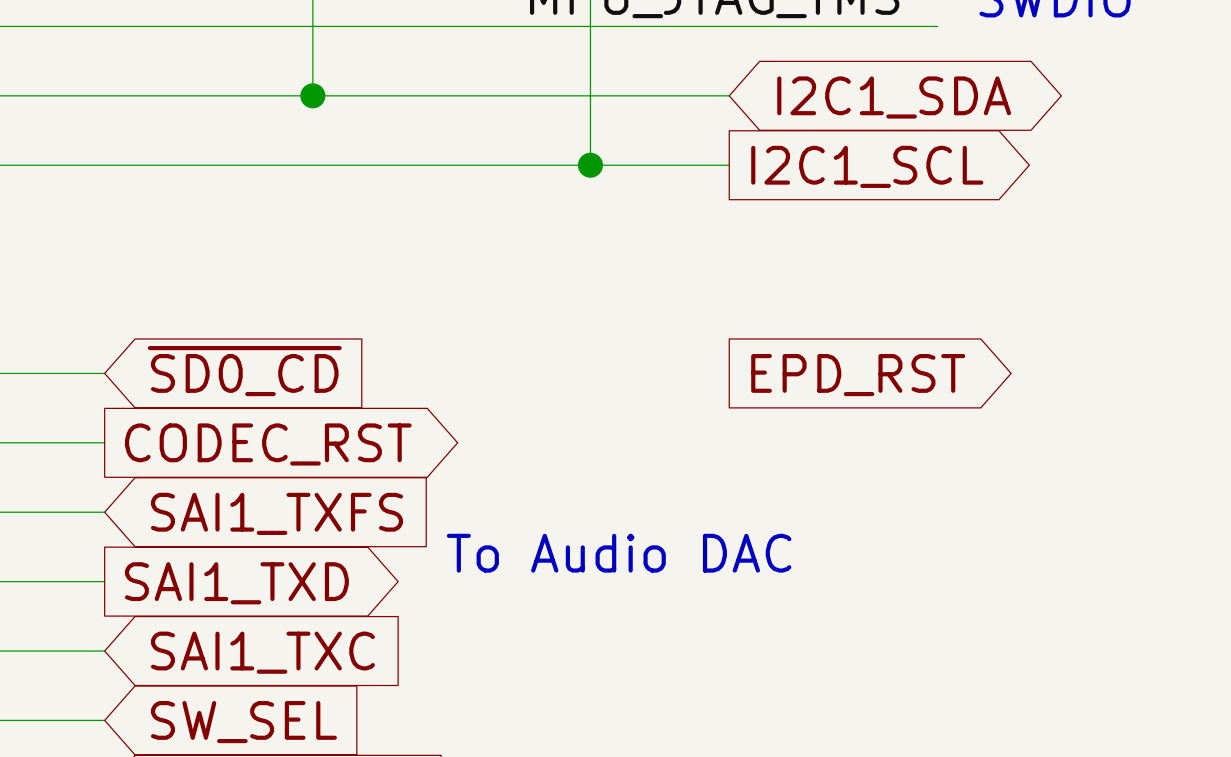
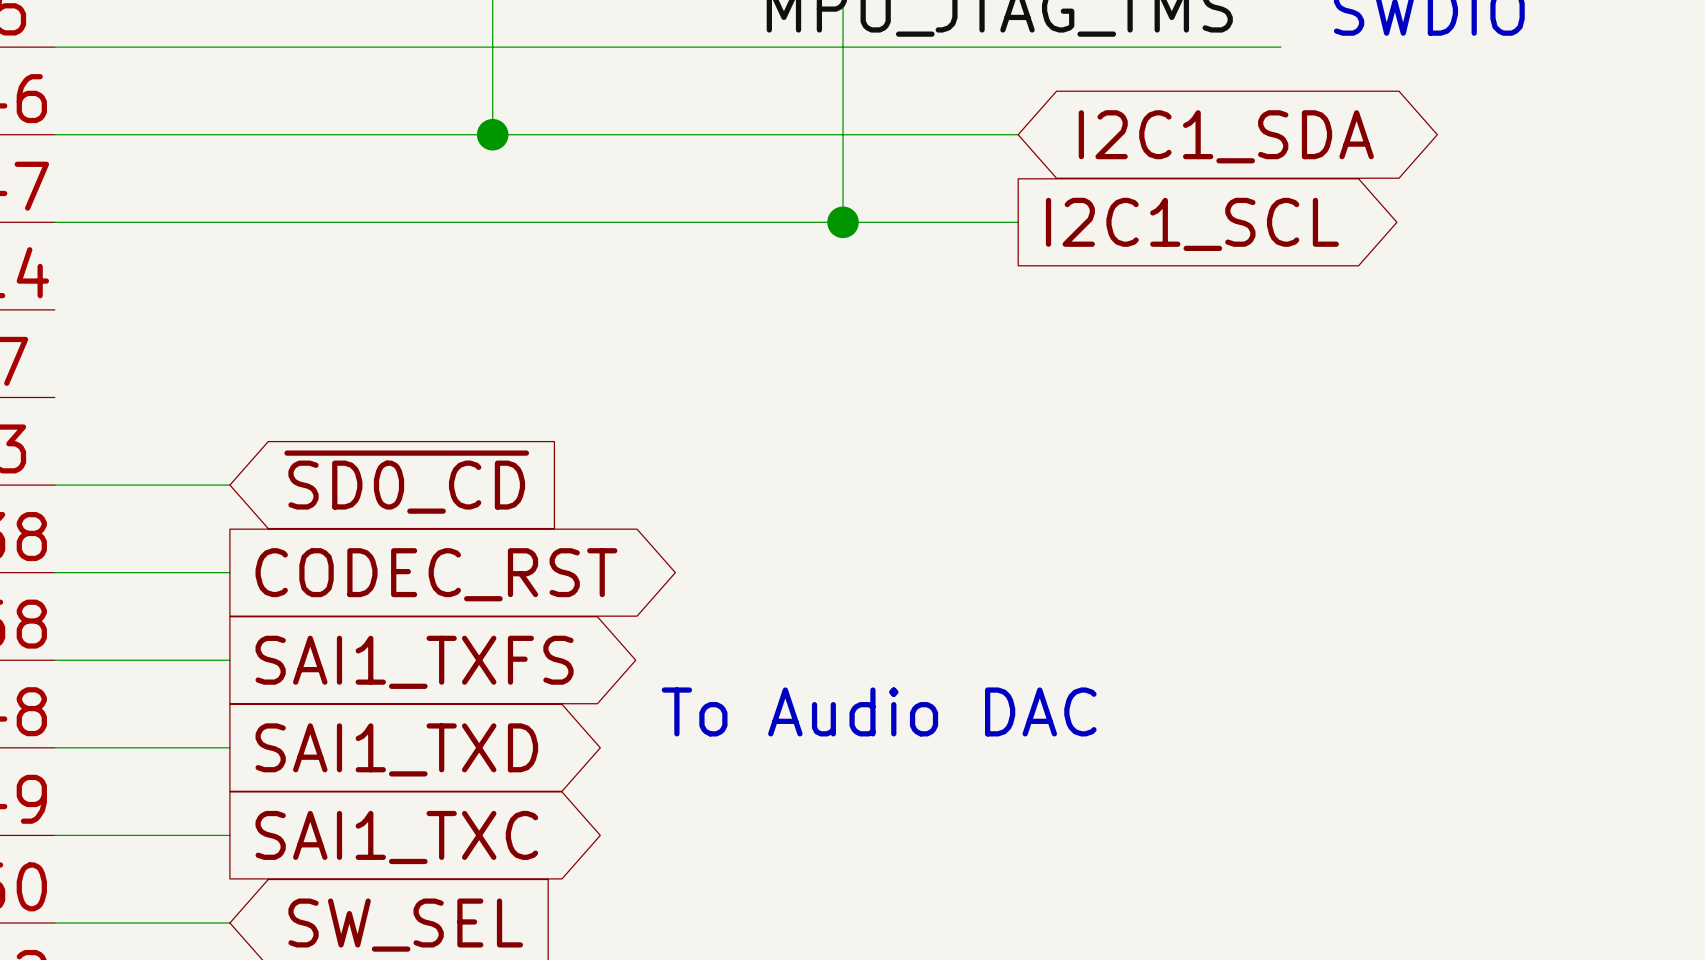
global label: EPD_RST (858, 375) -> none
global label shape: input (276, 513) -> output (414, 662)
global label shape: input (262, 652) -> output (396, 837)

